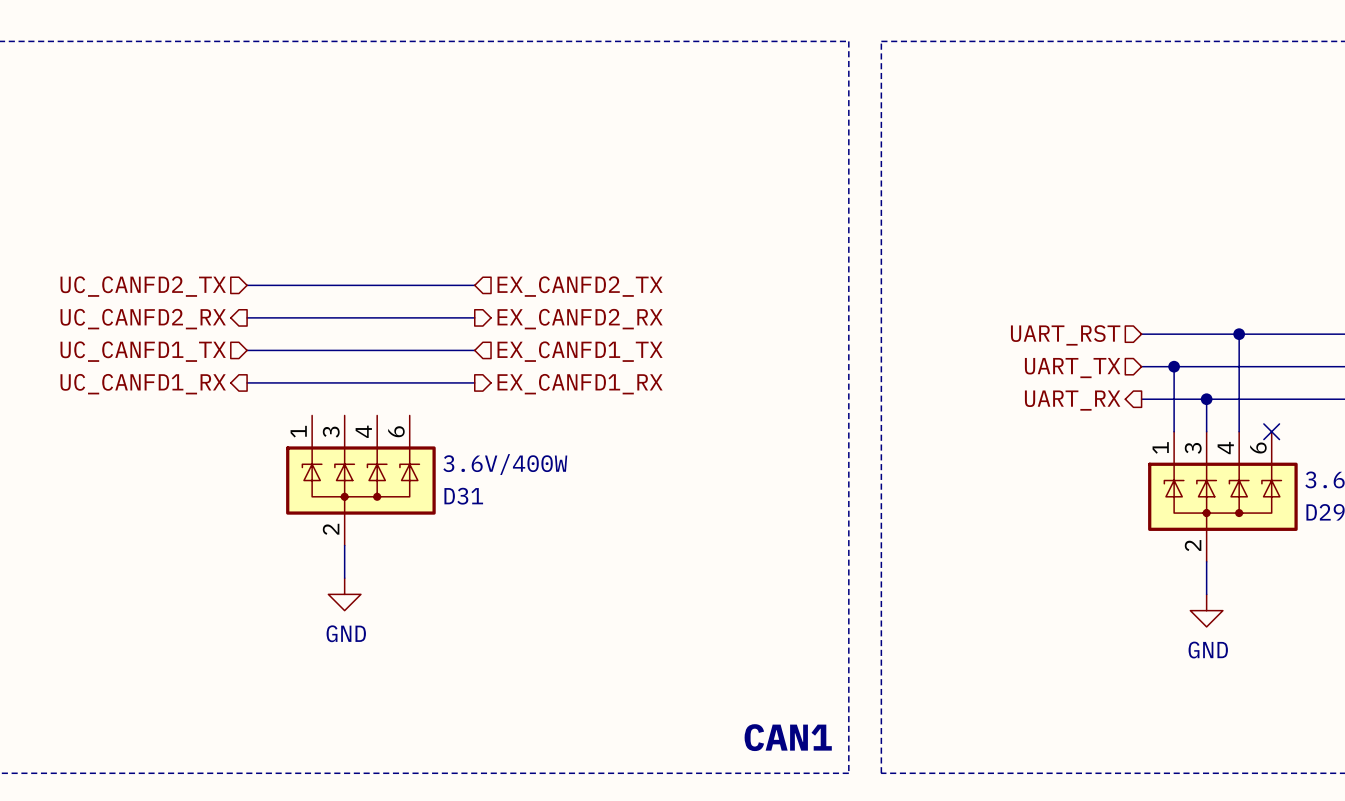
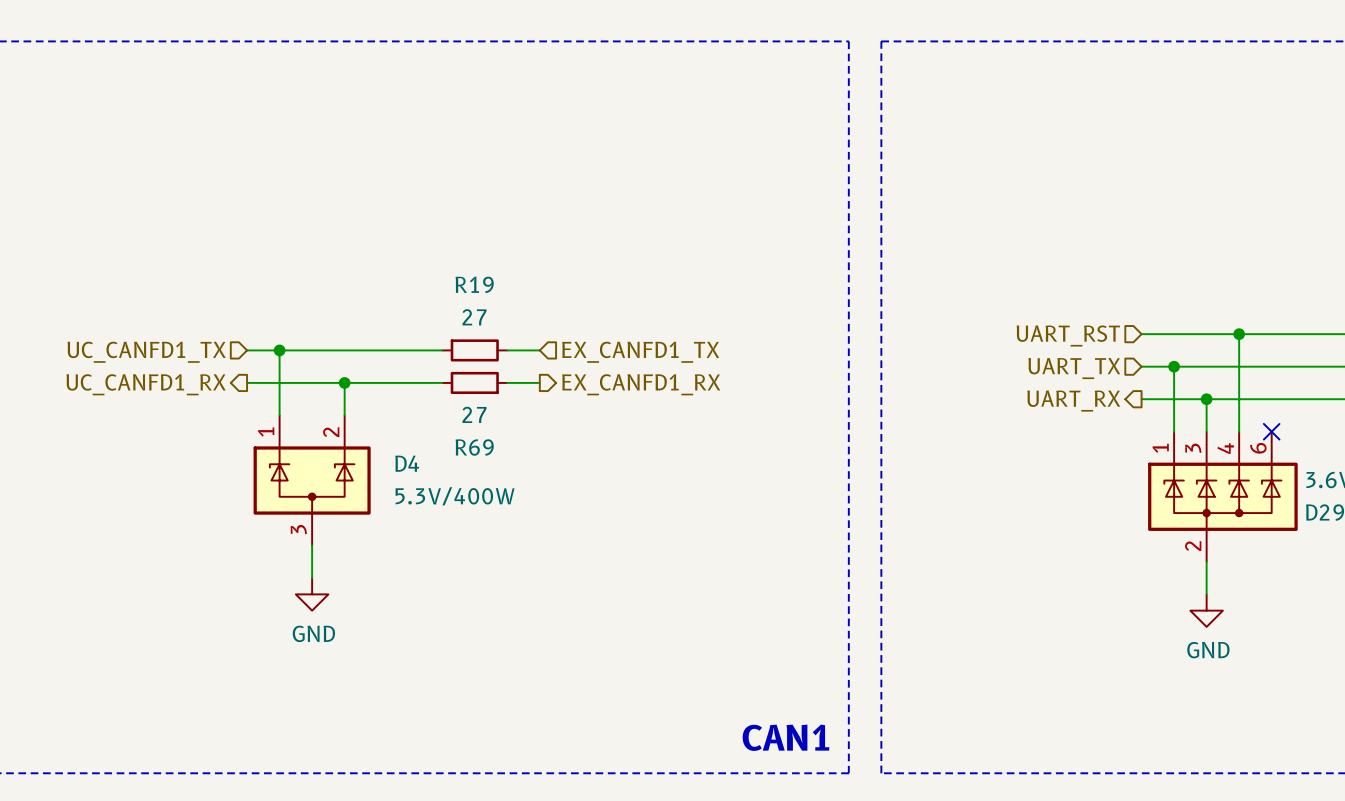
wire: (247, 285) (474, 285) -> none
hierarchical label: UC_CANFD2_TX (143, 286) -> none
hierarchical label: EX_CANFD2_TX (580, 286) -> none
wire: (247, 317) (474, 317) -> none
hierarchical label: UC_CANFD2_RX (143, 319) -> none
hierarchical label: EX_CANFD2_RX (580, 319) -> none
wire: none -> (279, 350) (279, 415)
junction: none -> (279, 350)
wire: (442, 350) (474, 350) -> (507, 350) (539, 350)
R19: none -> 27 (474, 350)
hierarchical label position: EX_CANFD1_TX (580, 351) -> EX_CANFD1_TX (640, 352)
wire: none -> (344, 382) (344, 415)
junction: none -> (344, 382)
wire: (442, 382) (474, 382) -> (507, 382) (539, 382)
R69: none -> 27 (474, 382)
hierarchical label position: EX_CANFD1_RX (580, 384) -> EX_CANFD1_RX (641, 384)
D4: none -> 5.3V/400W (312, 480)
D31: 3.6V/400W (360, 480) -> none
wire: (344, 545) (344, 578) -> (312, 545) (312, 578)
power symbol position: GND (344, 594) -> GND (312, 594)

